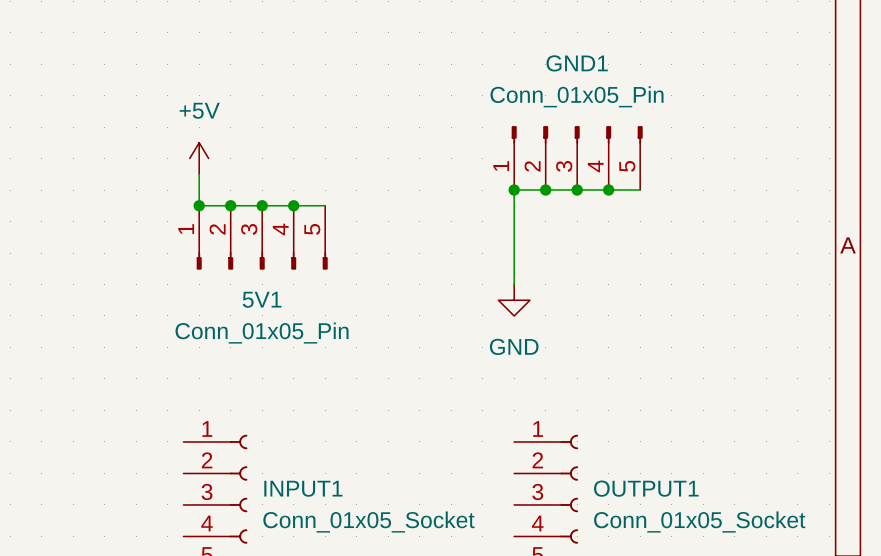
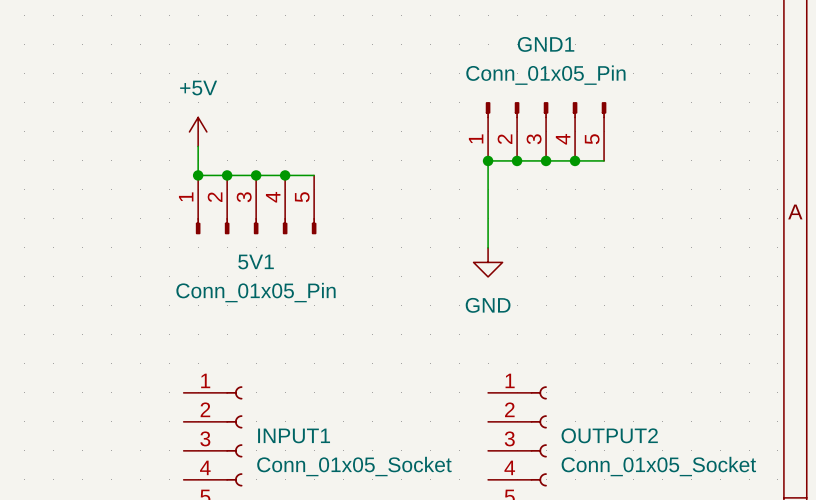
OUTPUT1 name: OUTPUT1 (646, 488) -> OUTPUT2 (609, 435)

